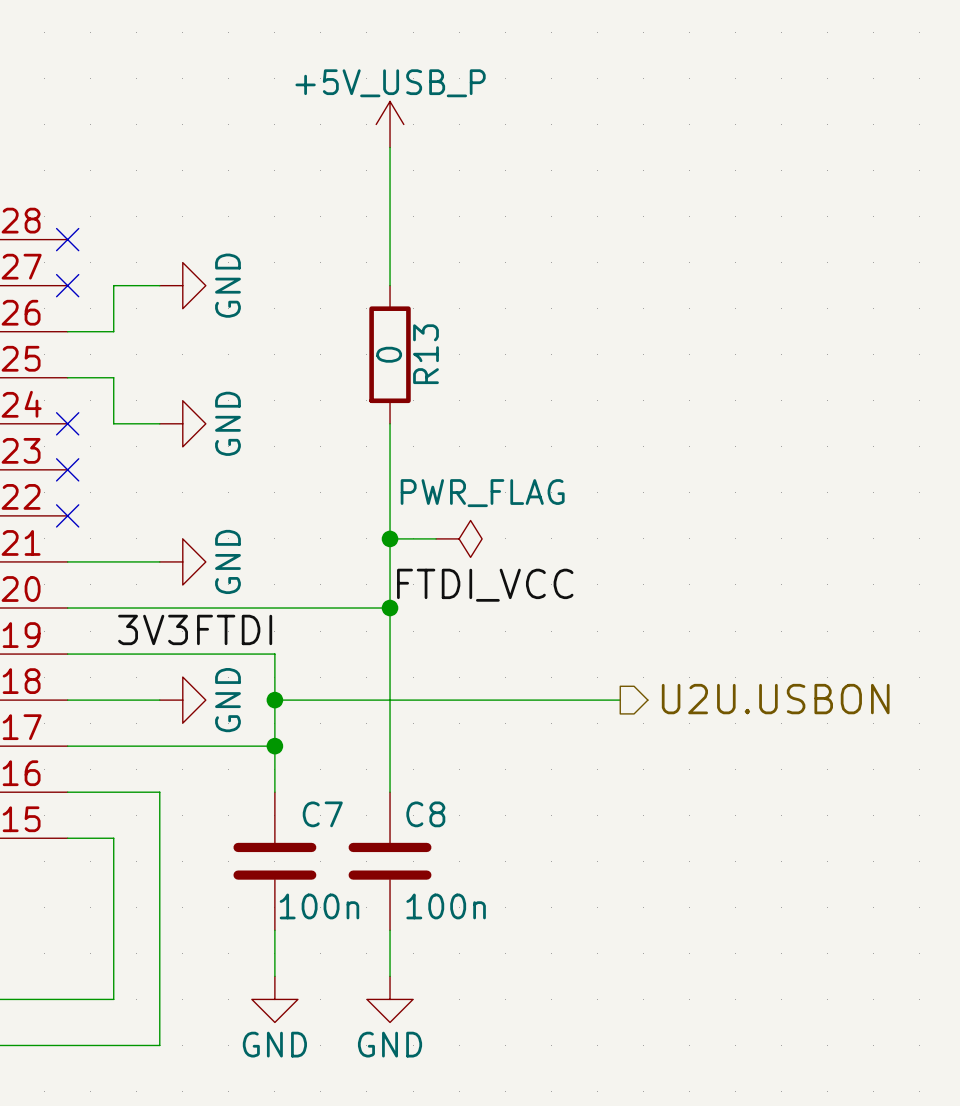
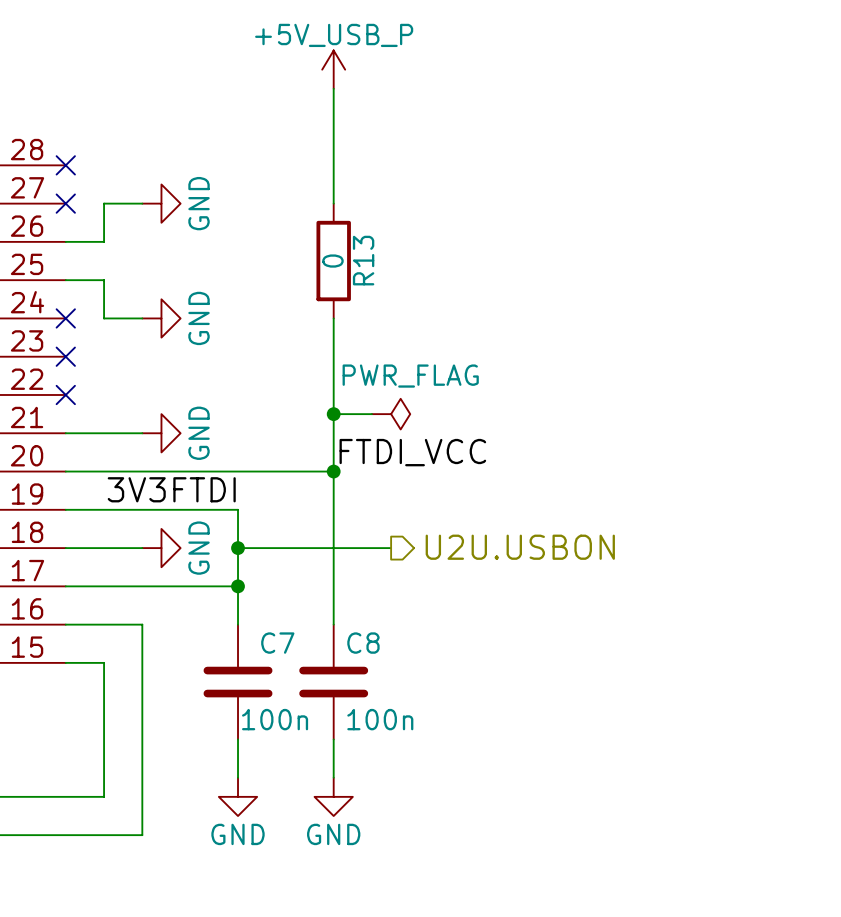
hierarchical label position: U2U.USBON (775, 699) -> U2U.USBON (520, 547)
wire: (459, 700) (620, 700) -> none

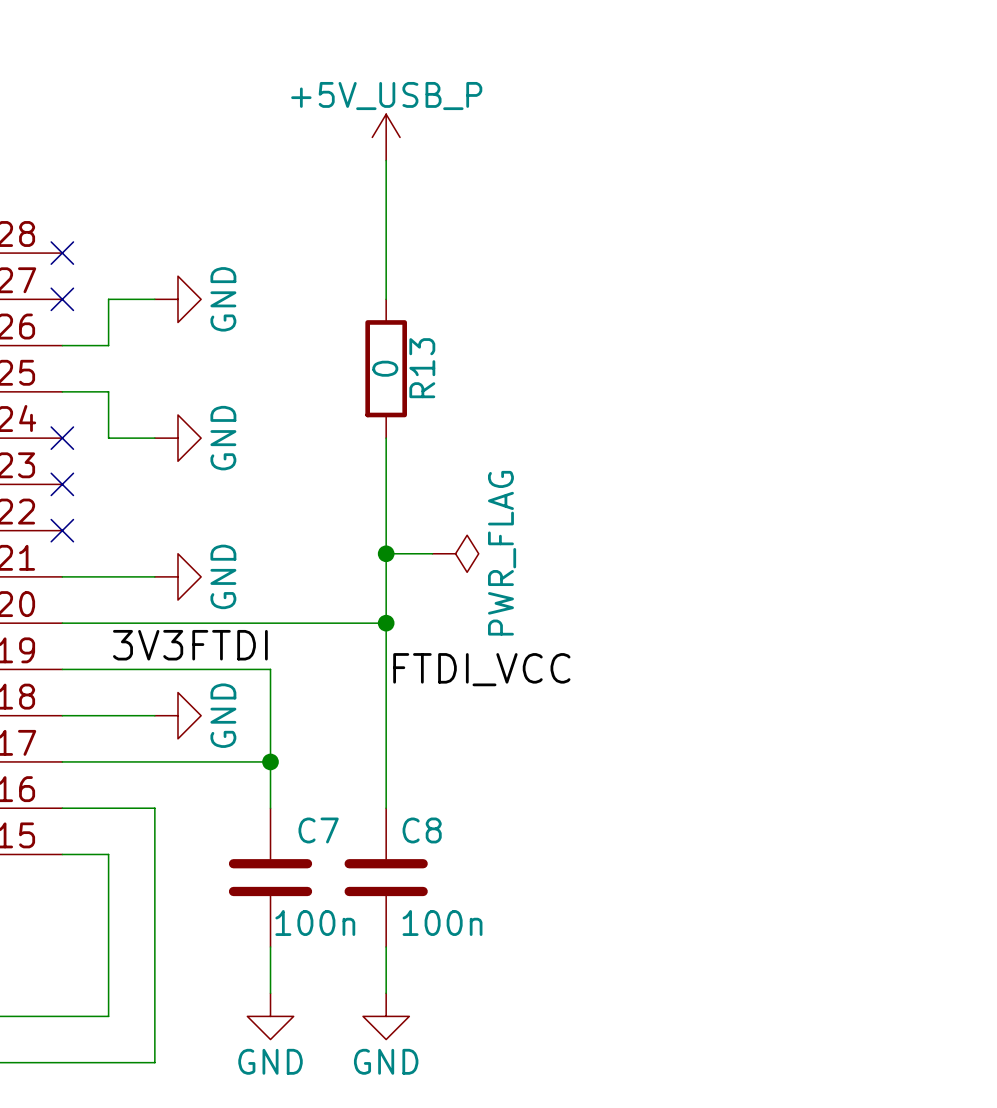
power symbol text rotation: 0° (410, 376) -> 90° counterclockwise (502, 553)
label position: FTDI_VCC (412, 452) -> FTDI_VCC (481, 669)
hierarchical label: U2U.USBON (520, 547) -> none
wire: (238, 548) (391, 548) -> none
junction: (238, 548) -> none

